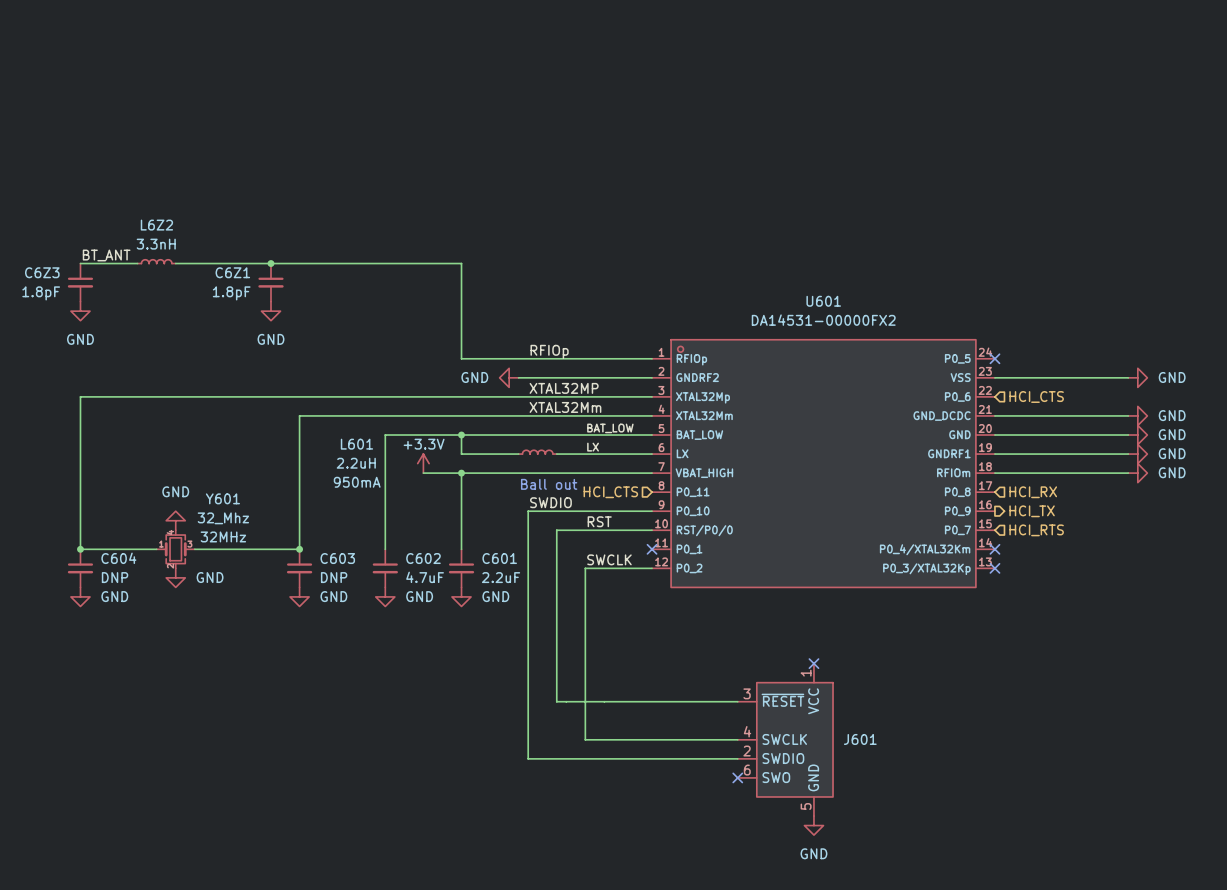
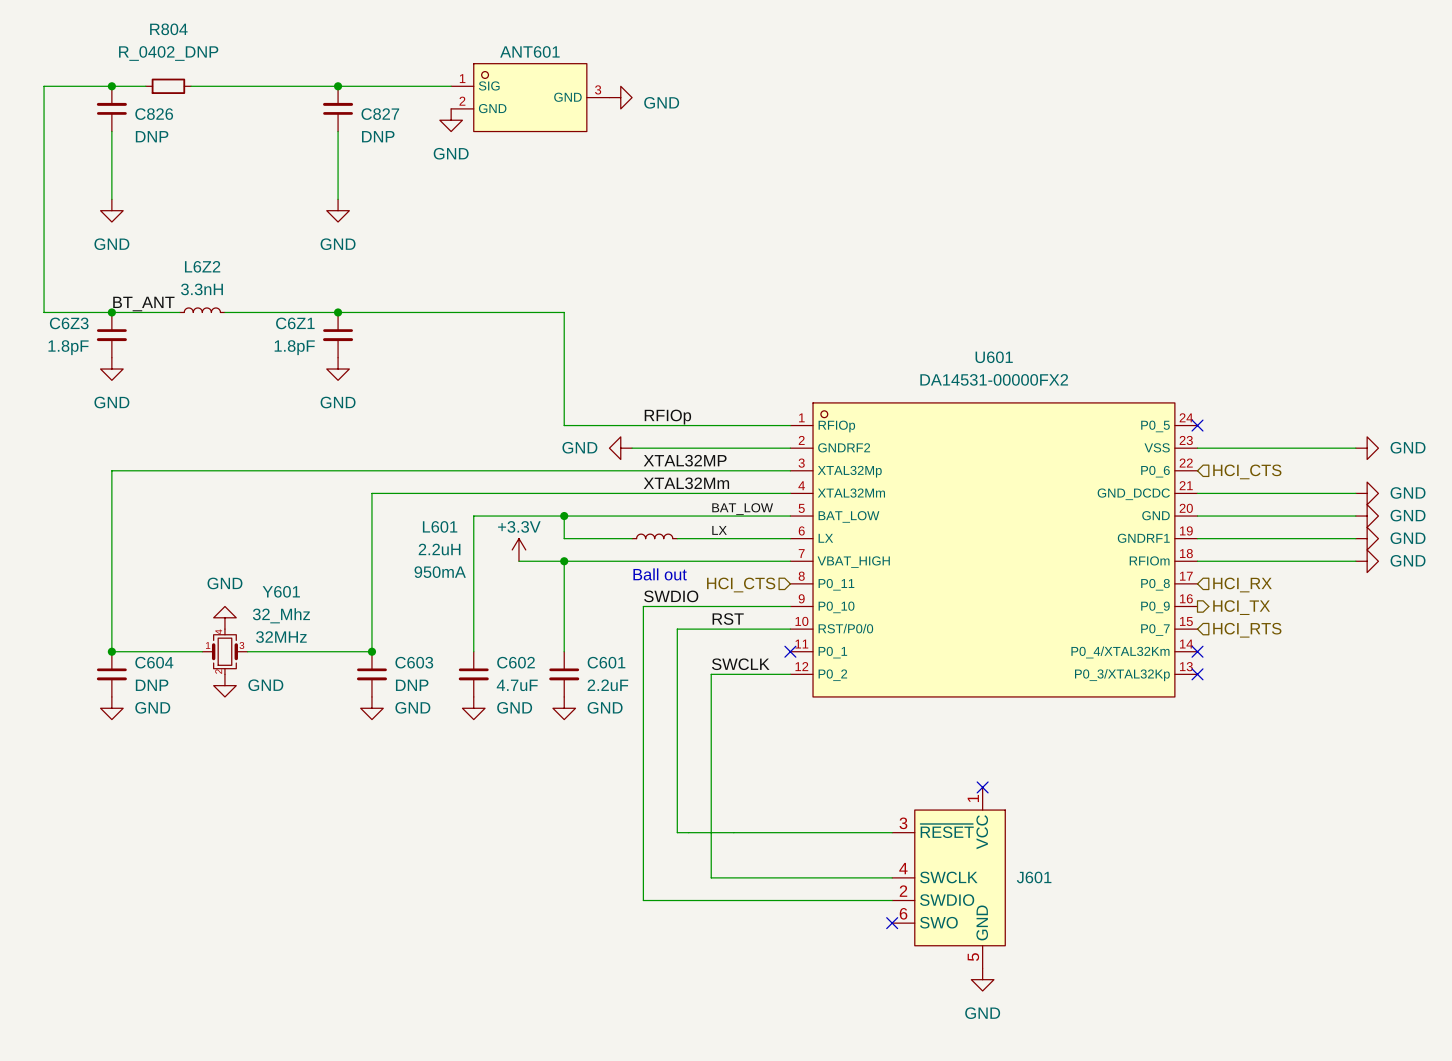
junction: none -> (111, 86)
wire: none -> (145, 86) (44, 86) (44, 312) (111, 312)
R804: none -> R_0402_DNP (168, 86)
wire: none -> (191, 86) (451, 86)
junction: none -> (338, 86)
ANT601: none -> (530, 97)
power symbol: none -> GND (620, 97)
C826: none -> (111, 108)
C827: none -> (338, 108)
power symbol: none -> GND (451, 120)
wire: none -> (111, 131) (111, 199)
wire: none -> (338, 131) (338, 199)
power symbol: none -> GND (111, 210)
power symbol: none -> GND (338, 210)
junction: none -> (111, 312)

